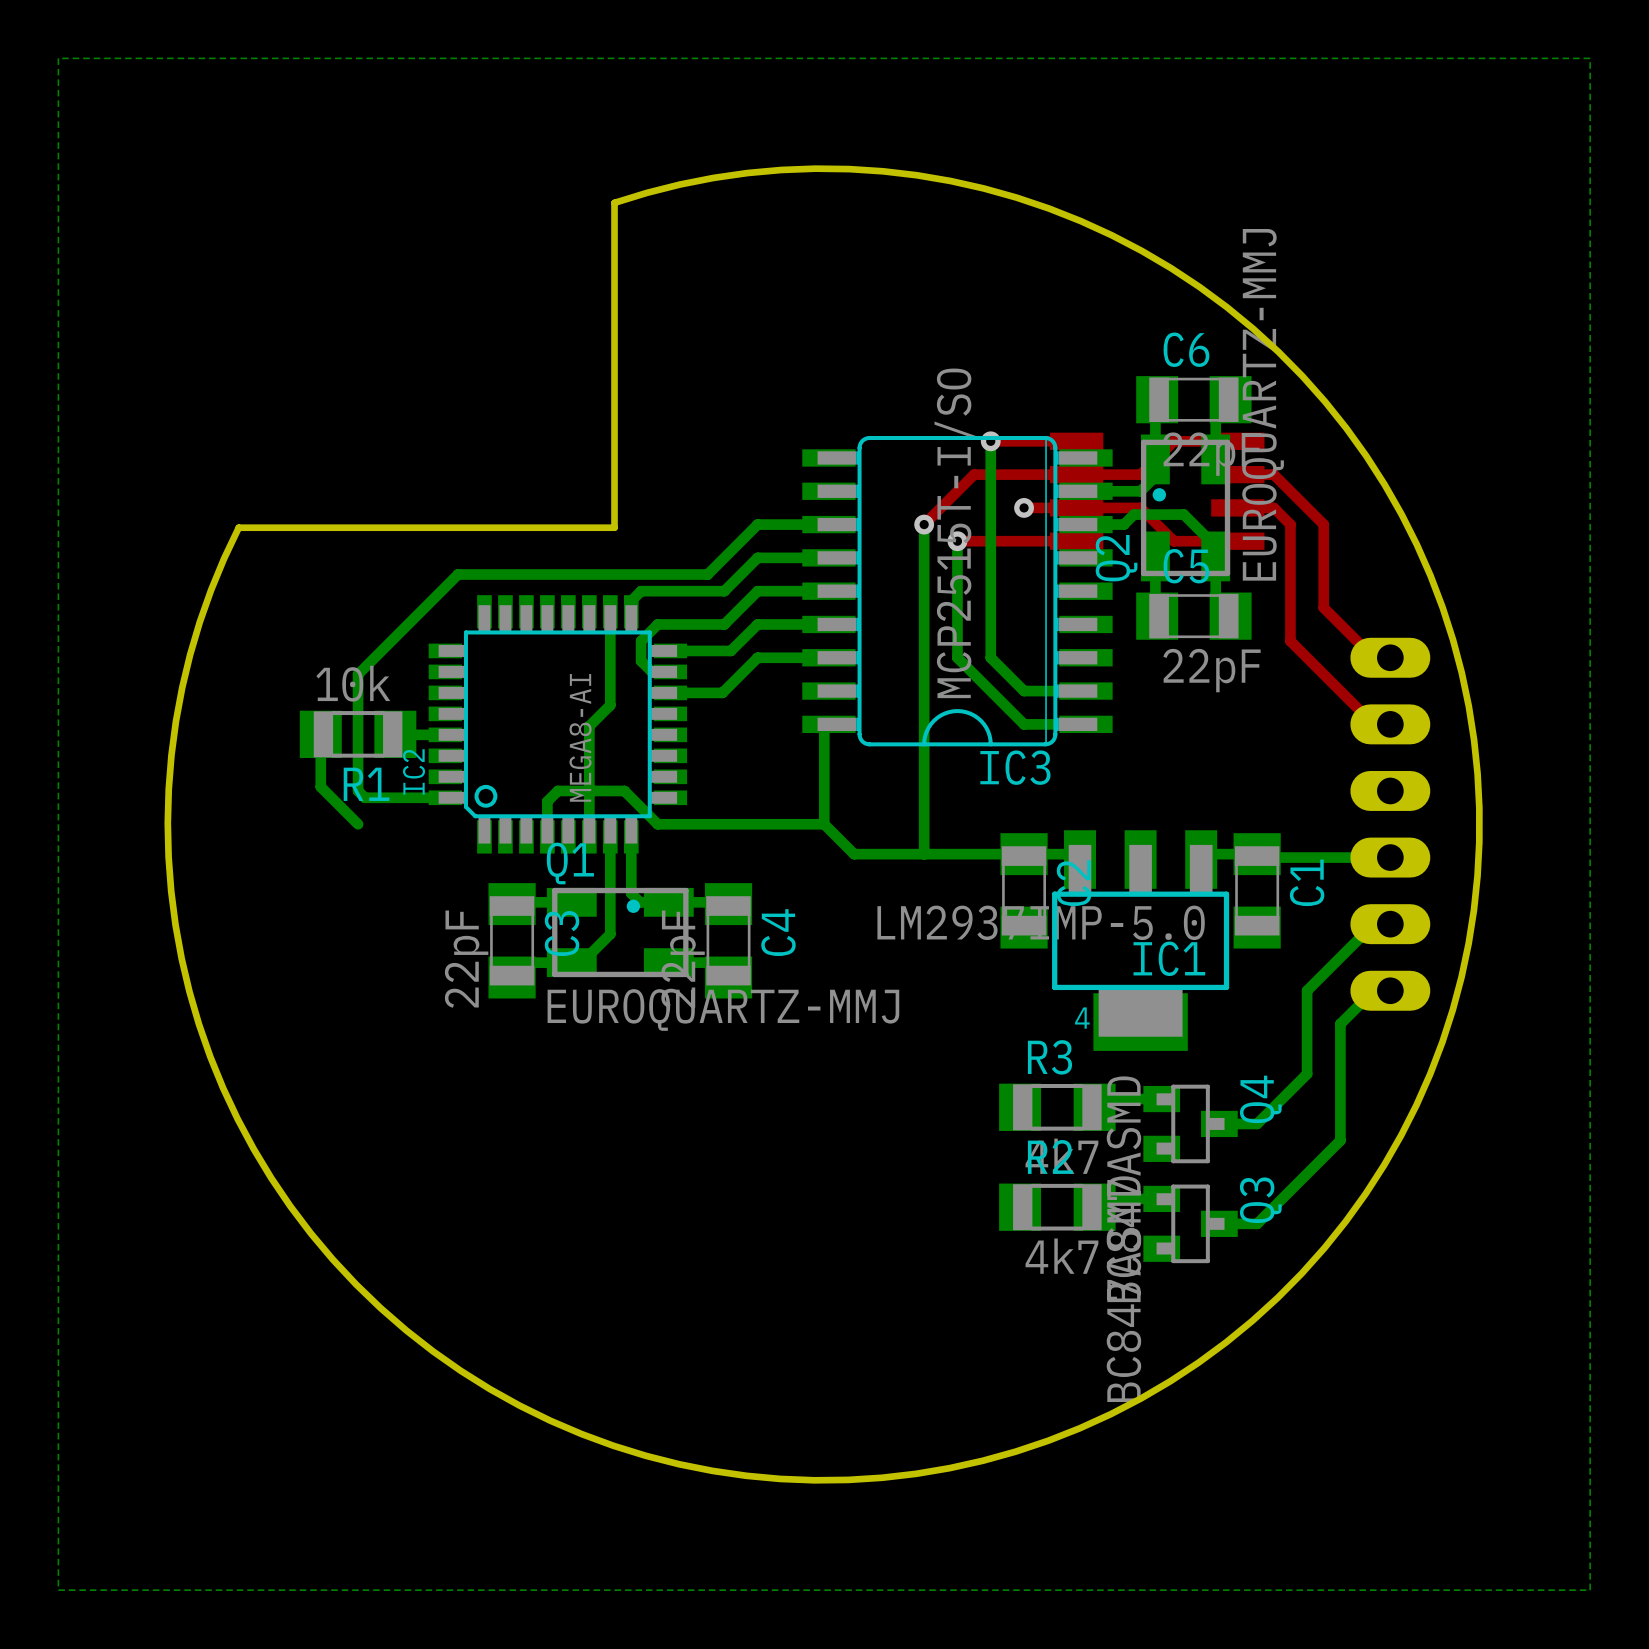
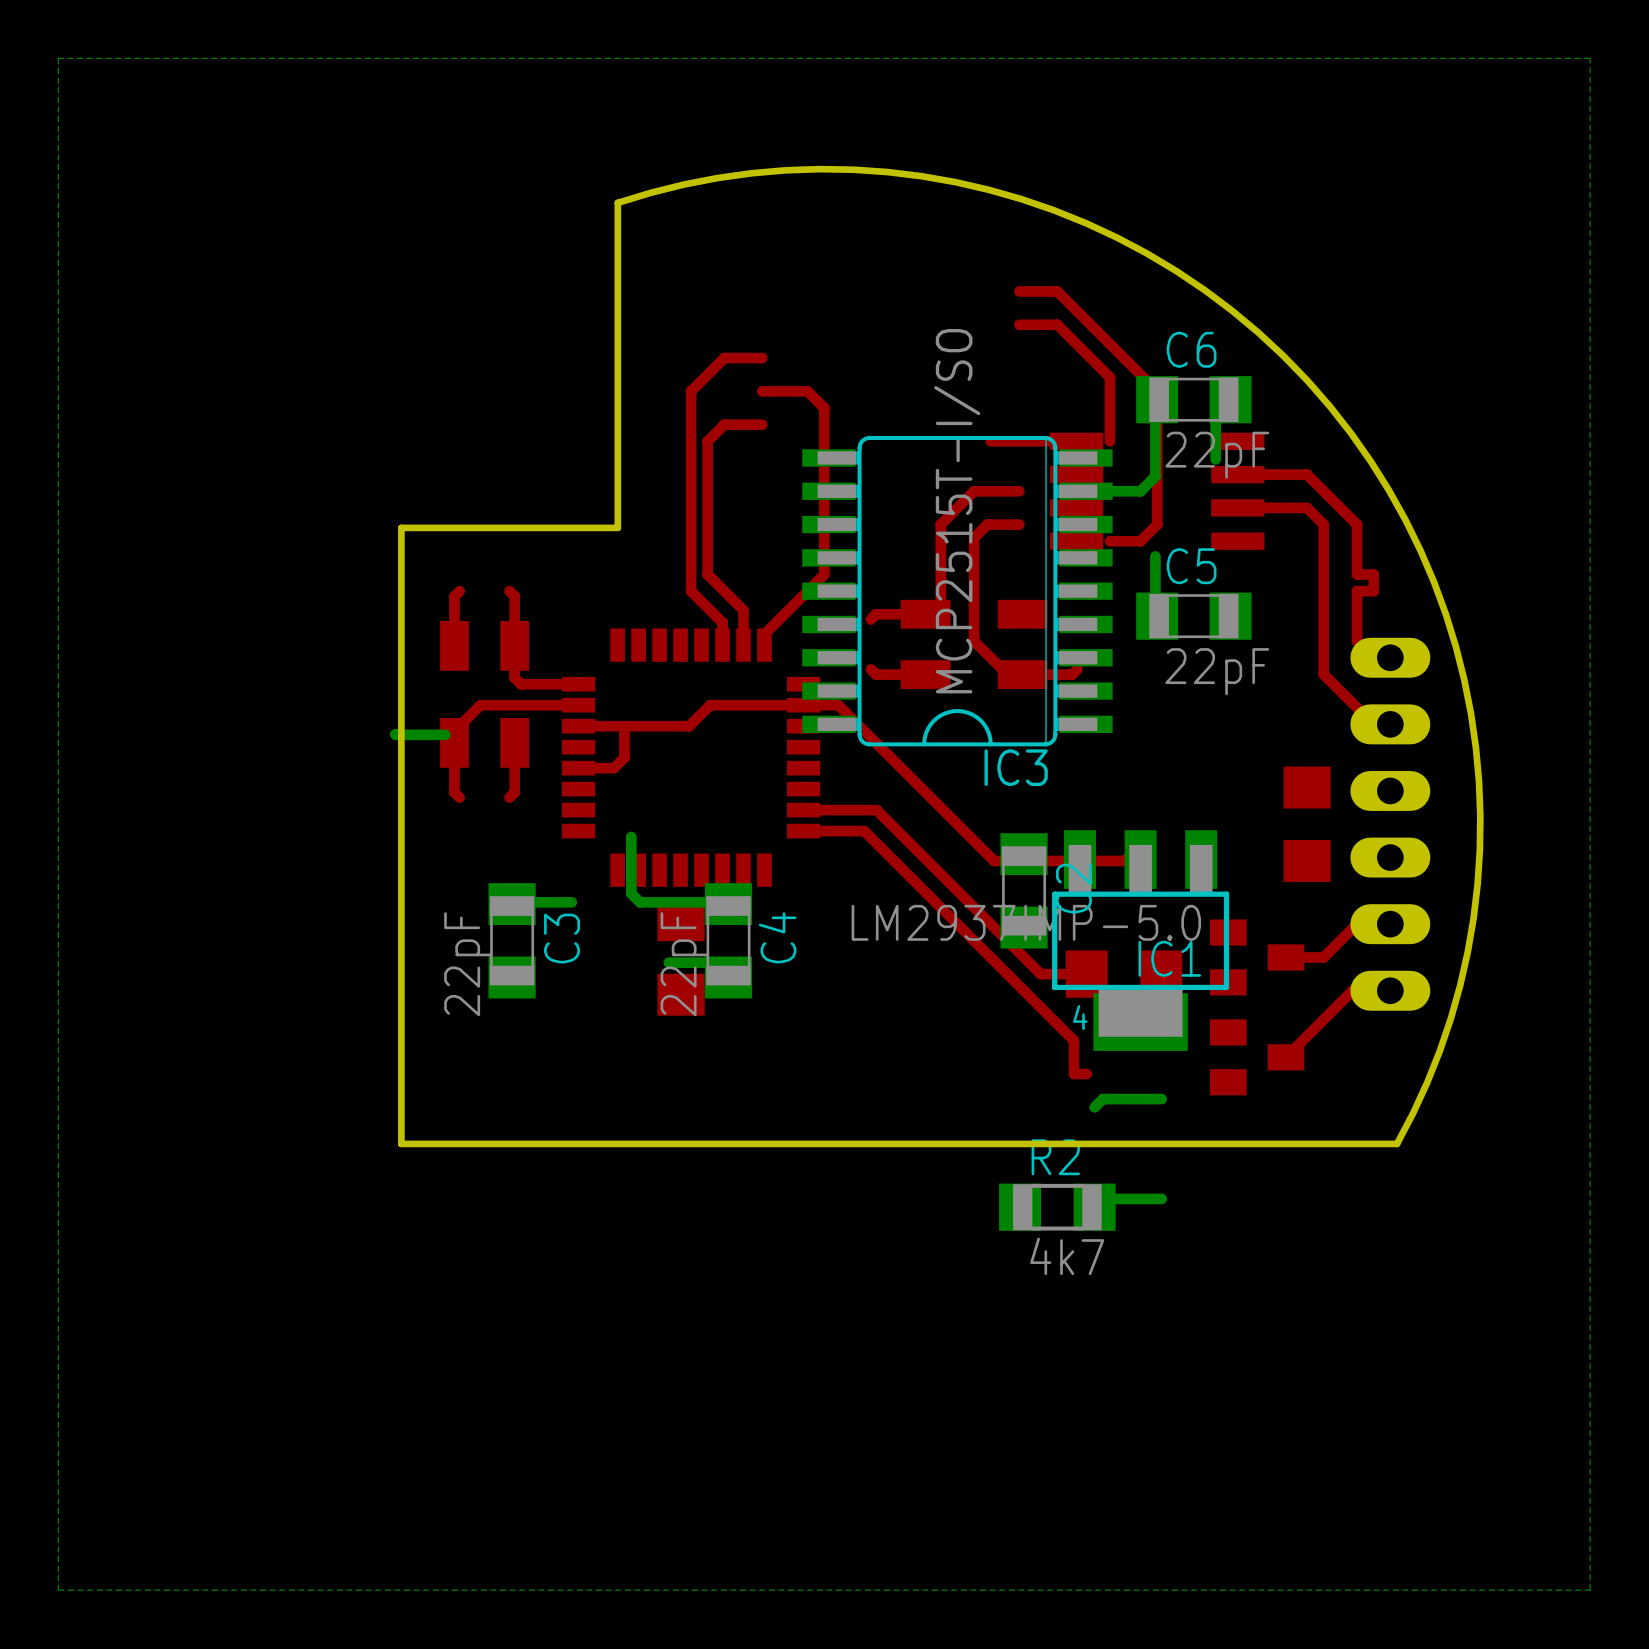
board edge: (614, 202) (614, 527) (238, 527) (224, 558) (211, 589) (190, 654) (175, 721) (168, 789) (168, 857) (175, 924) (189, 991) (210, 1056) (237, 1118) (271, 1178) (310, 1233) (332, 1259) (380, 1308) (433, 1351) (489, 1389) (550, 1420) (613, 1445) (679, 1464) (746, 1475) (814, 1480) (882, 1477) (916, 1473) (983, 1460) (1048, 1440) (1110, 1414) (1170, 1381) (1226, 1342) (1277, 1297) (1324, 1248) (1365, 1193) (1401, 1135) (1416, 1105) (1442, 1042) (1461, 976) (1473, 909) (1479, 842) (1477, 773) (1474, 740) (1461, 673) (1442, 607) (1416, 544) (1384, 484) (1346, 428) (1302, 376) (1253, 328) (1199, 287) (1141, 250) (1111, 235) (1049, 208) (983, 188) (950, 181) (883, 171) (815, 168) (747, 173) (680, 184) (614, 202) -> (617, 527) (617, 202) (683, 184) (717, 178) (785, 170) (819, 169) (887, 172) (955, 182) (1021, 199) (1085, 223) (1116, 237) (1176, 271) (1232, 310) (1283, 356) (1329, 406) (1370, 461) (1388, 490) (1420, 550) (1445, 614) (1456, 647) (1471, 713) (1479, 781) (1480, 816) (1479, 850) (1473, 918) (1467, 952) (1450, 1018) (1427, 1082) (1397, 1143) (401, 1143) (401, 527) (617, 527)
top track: none -> (1019, 291) (1057, 291) (1157, 391) (1157, 524) (1140, 541) (1109, 541)
top track: none -> (1019, 324) (1057, 324) (1109, 377) (1109, 441)
top track: none -> (762, 358) (724, 358) (691, 391) (691, 591) (722, 622) (722, 645)
top track: none -> (762, 391) (807, 391) (824, 408) (824, 574) (764, 634) (764, 645)
top track: none -> (762, 424) (724, 424) (707, 441) (707, 574) (743, 610) (743, 645)
bottom track: (990, 441) (990, 657) (1024, 691) (1085, 691) -> none
via: (990, 441) -> none
top track: (1237, 441) (1173, 441) (1140, 474) (974, 474) (924, 524) -> none
top track: (1273, 474) (1307, 507) -> (1273, 507) (1307, 507)
top track: none -> (1273, 474) (1307, 474) (1357, 524) (1357, 574) (1373, 574) (1373, 591) (1357, 591) (1357, 641)
top track: none -> (1019, 491) (974, 491) (940, 524) (940, 607) (933, 607) (925, 614) (876, 614) (870, 619)
top track: (1024, 507) (1140, 507) (1173, 541) (1237, 541) -> none
via: (1024, 507) -> none
Q2 side: bottom (1185, 507) -> top (974, 644)
top track: (1273, 507) (1290, 524) (1290, 641) (1323, 674) -> none
bottom track: (828, 524) (757, 524) (707, 574) (457, 574) (358, 674) (358, 790) (364, 797) (445, 797) -> none
bottom track: (924, 524) (924, 854) -> none
via: (924, 524) -> none
top track: none -> (1019, 524) (987, 524) (974, 537) (974, 641) (1009, 676) (1072, 674) (1077, 669)
bottom track: (1085, 524) (1123, 524) (1133, 514) (1183, 514) (1215, 546) (1215, 601) (1230, 616) -> none
bottom track: (957, 541) (957, 657) (1024, 724) (1085, 724) -> none
via: (957, 541) -> none
top track: (1076, 541) (957, 541) -> none
bottom track: (828, 557) (757, 557) (724, 591) (641, 591) (631, 601) (631, 611) -> none
top track: none -> (459, 591) (454, 596) (454, 645)
top track: none -> (509, 591) (514, 596) (514, 645)
bottom track: (828, 591) (757, 591) (724, 624) (657, 624) (641, 641) (641, 661) (651, 671) (670, 671) -> none
top track: (1323, 607) (1357, 641) -> (1323, 607) (1323, 674)
bottom track: (610, 611) (610, 705) (589, 726) (589, 836) -> none
bottom track: (828, 624) (757, 624) (730, 650) (670, 650) -> none
top track: none -> (514, 646) (514, 677) (521, 684) (578, 684)
bottom track: (828, 657) (757, 657) (722, 692) (670, 692) -> none
top track: none -> (870, 669) (876, 674) (925, 674)
top track: none -> (578, 705) (480, 705) (457, 727) (457, 739) (454, 742) (454, 792) (459, 797)
IC2 side: bottom (557, 724) -> top (691, 757)
bottom track: (828, 724) (824, 729) (824, 824) -> none
top track: none -> (578, 726) (689, 726) (710, 705) (838, 705) (994, 860) (1124, 860) (1129, 855)
top track: none -> (624, 726) (624, 757) (613, 768) (578, 768)
bottom track: (320, 734) (320, 786) (358, 824) -> none
R1 side: bottom (358, 734) -> top (681, 957)
top track: none -> (514, 742) (514, 792) (509, 797)
top track: none -> (803, 810) (876, 810) (1040, 974) (1086, 974)
bottom track: (824, 824) (854, 854) (1074, 854) (1080, 859) -> none
bottom track: (824, 824) (657, 824) (624, 790) (557, 790) (547, 801) (547, 836) -> none
top track: none -> (803, 831) (864, 831) (1074, 1040) (1074, 1074) (1086, 1074)
bottom track: (610, 836) (610, 934) (581, 962) (518, 962) (512, 977) -> none
bottom track: (1390, 857) (1260, 857) (1257, 854) (1206, 854) (1201, 859) -> none
C1 side: bottom (1257, 890) -> top (1307, 824)
bottom track: (1390, 924) (1373, 924) (1307, 990) (1307, 1074) (1257, 1123) (1219, 1123) -> none
top track: none -> (1390, 924) (1357, 924) (1323, 957) (1285, 957)
Q1 side: bottom (620, 932) -> top (484, 694)
bottom track: (1390, 990) (1373, 990) (1340, 1024) (1340, 1140) (1257, 1223) (1219, 1223) -> none
top track: none -> (1390, 990) (1352, 990) (1285, 1057)
R3 side: bottom (1057, 1107) -> top (1123, 974)
Q4 side: bottom (1190, 1123) -> top (1257, 957)
Q3 side: bottom (1190, 1223) -> top (1257, 1057)

